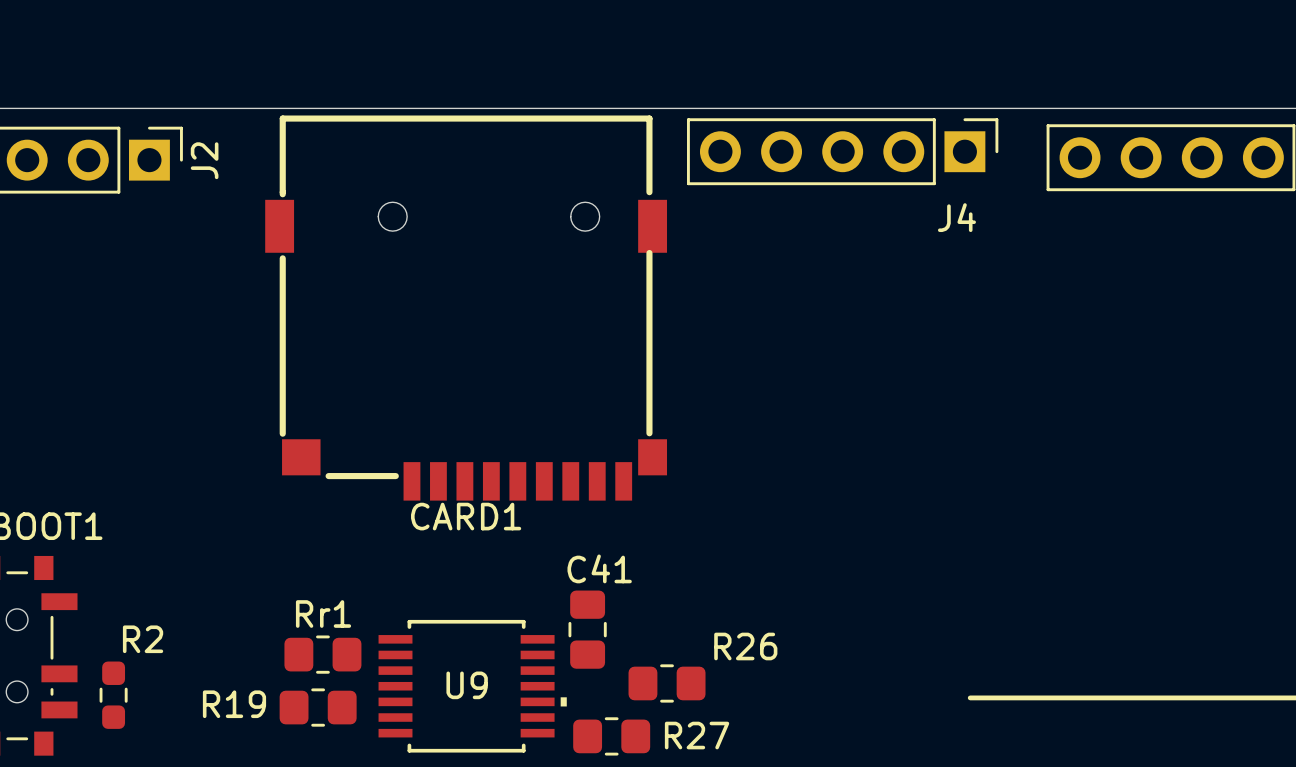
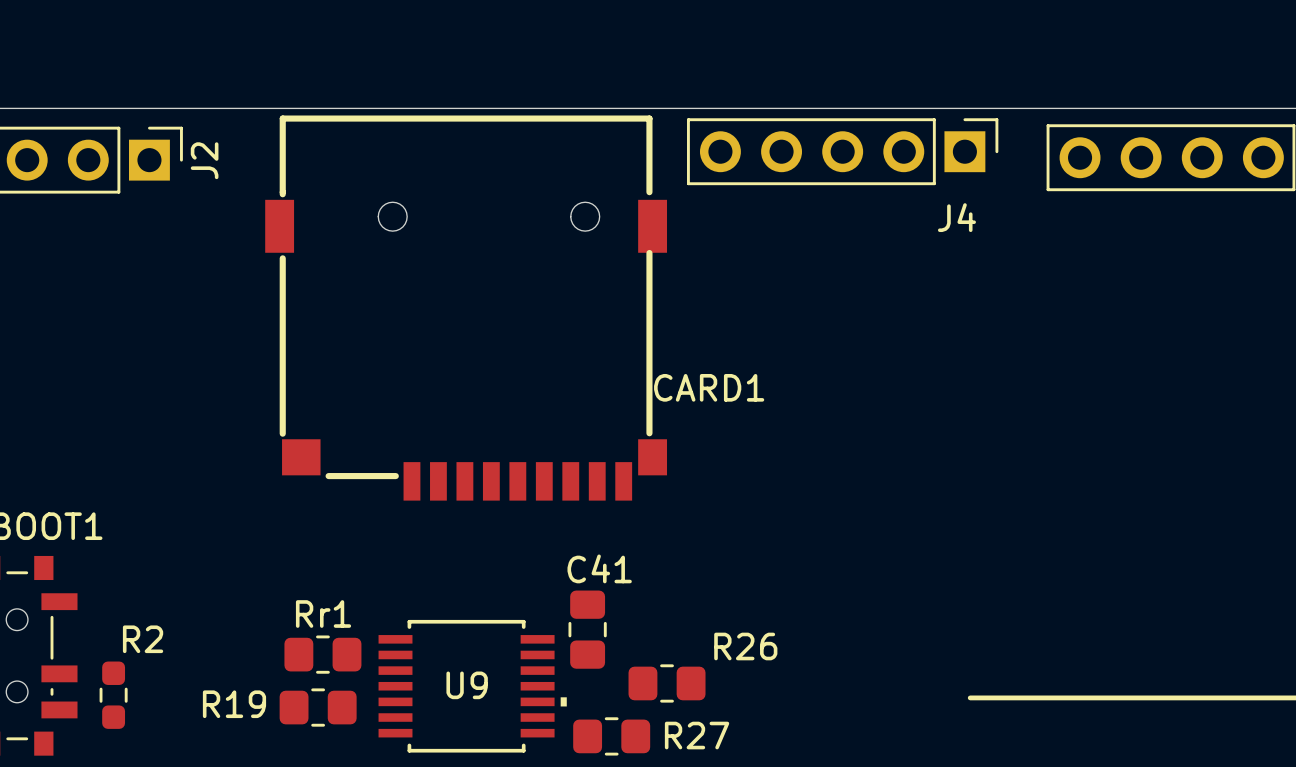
CARD1 name position: CARD1 (466, 516) -> CARD1 (709, 387)

